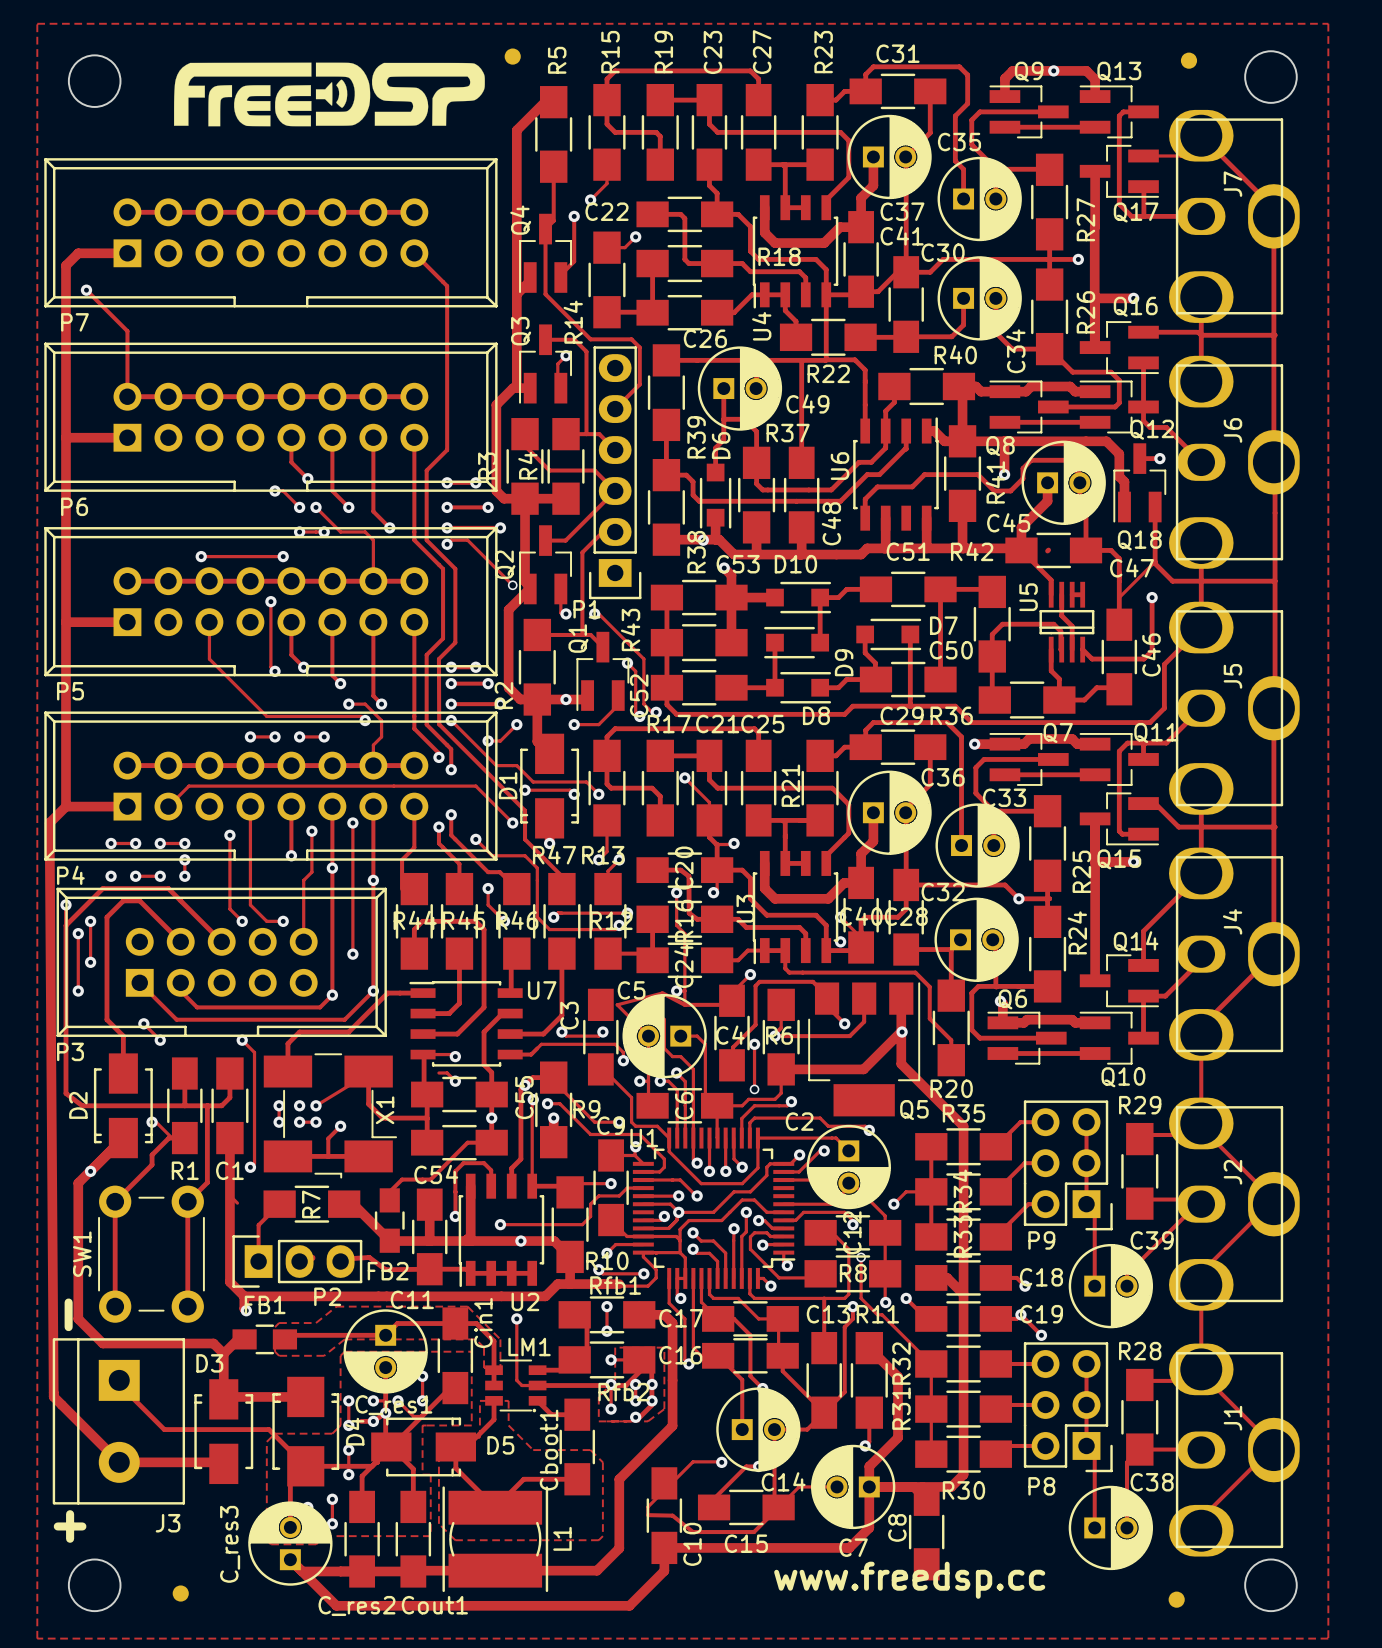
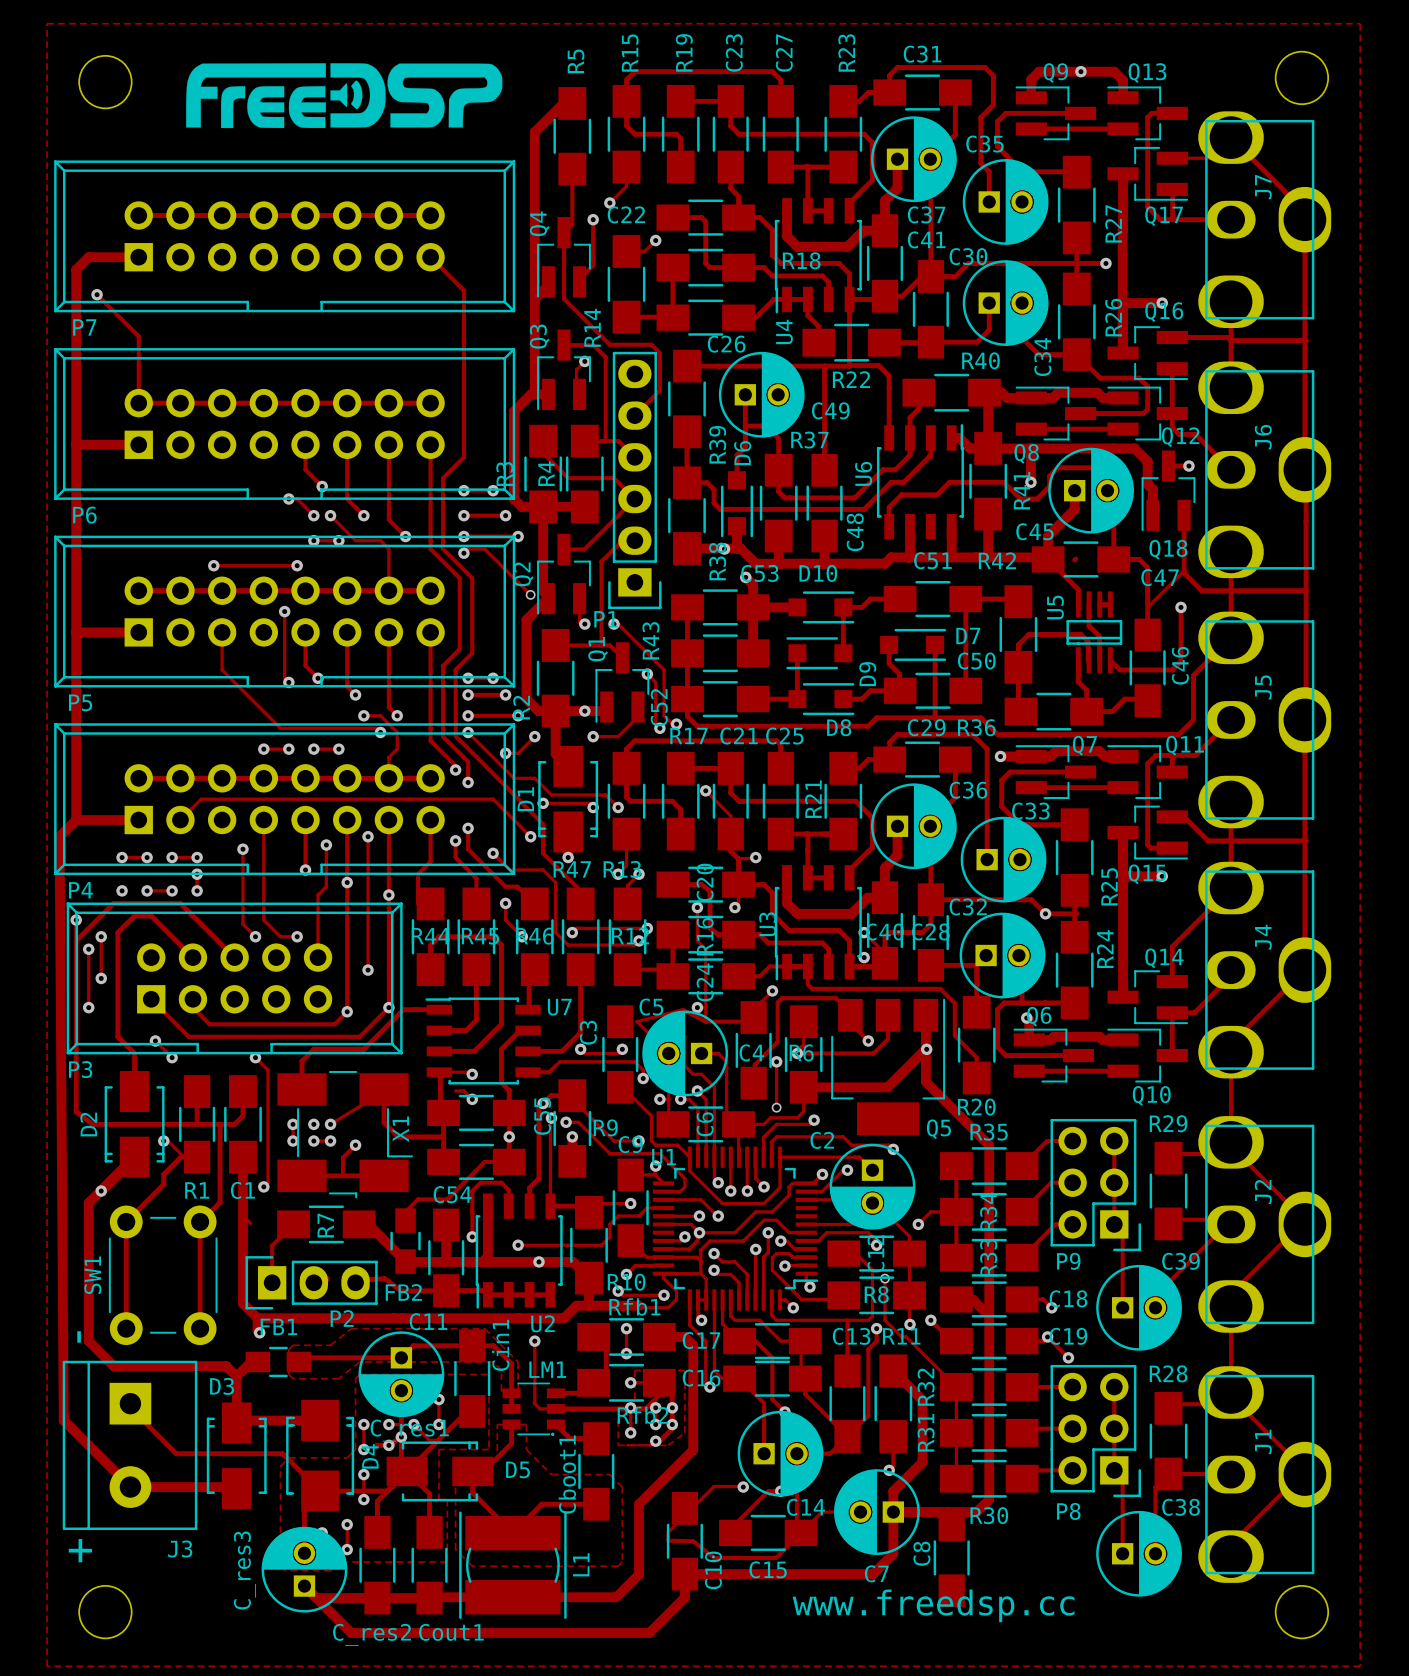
part: (512, 56) -> none
part: (1188, 60) -> none
part: (180, 1593) -> none
part: (1176, 1599) -> none

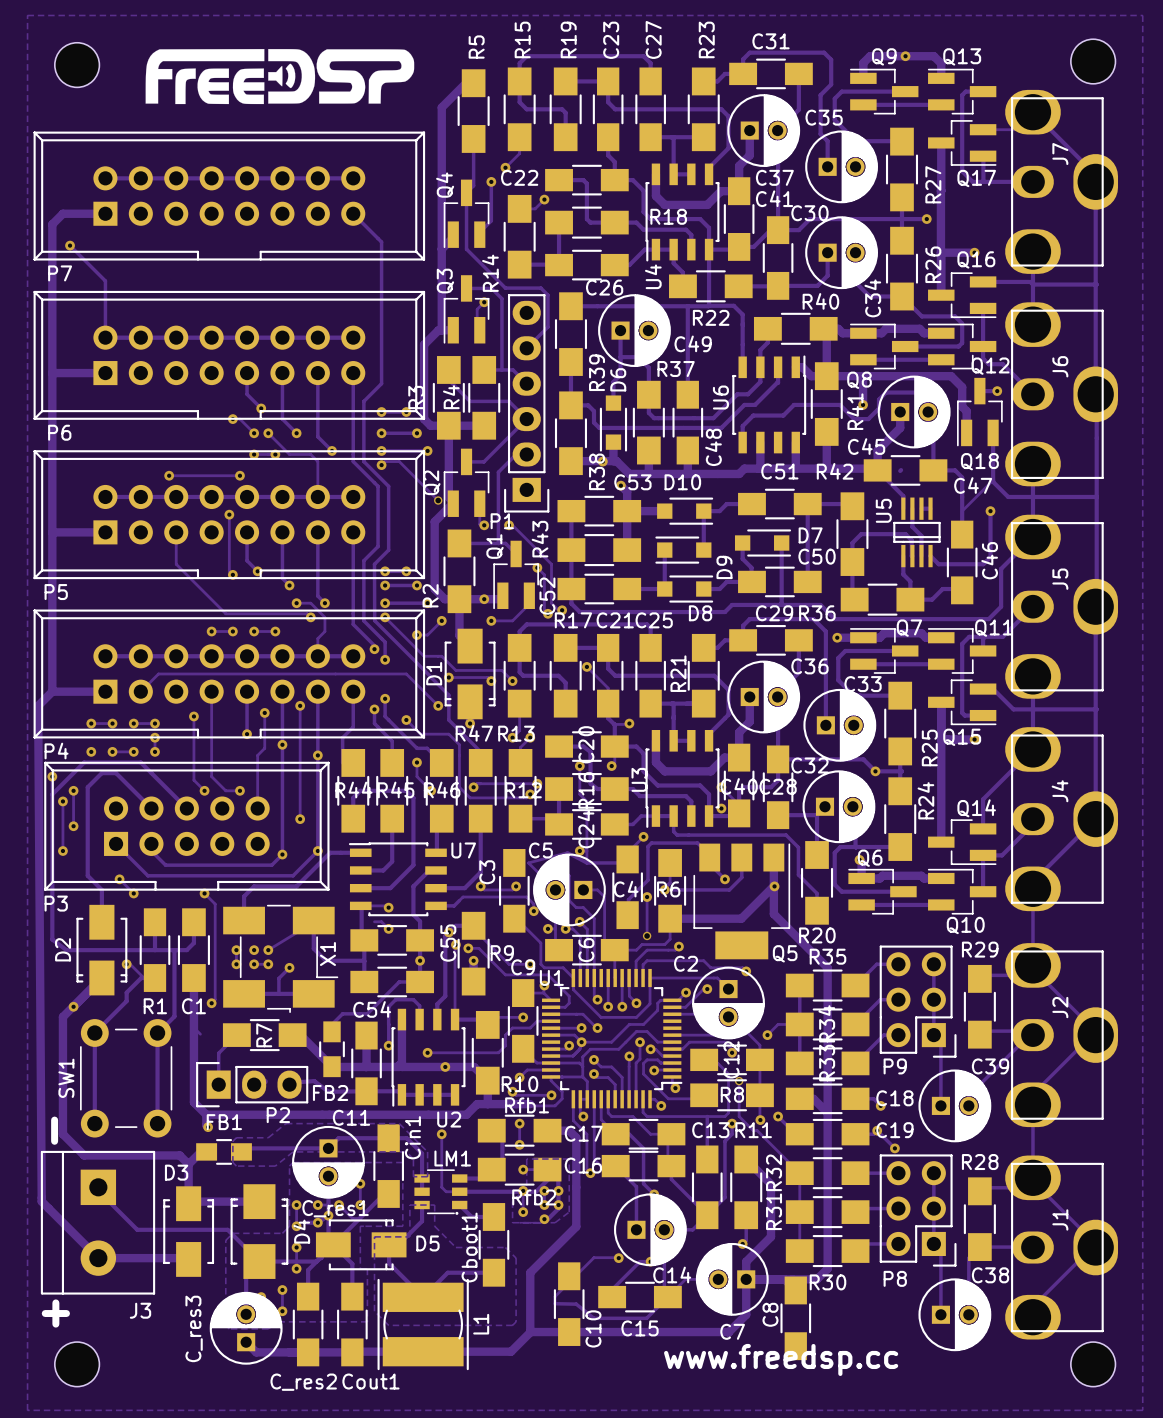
track: (684, 1574) (684, 1597) (649, 1632) (351, 1632) (316, 1598) -> (569, 1332) (530, 1332)

